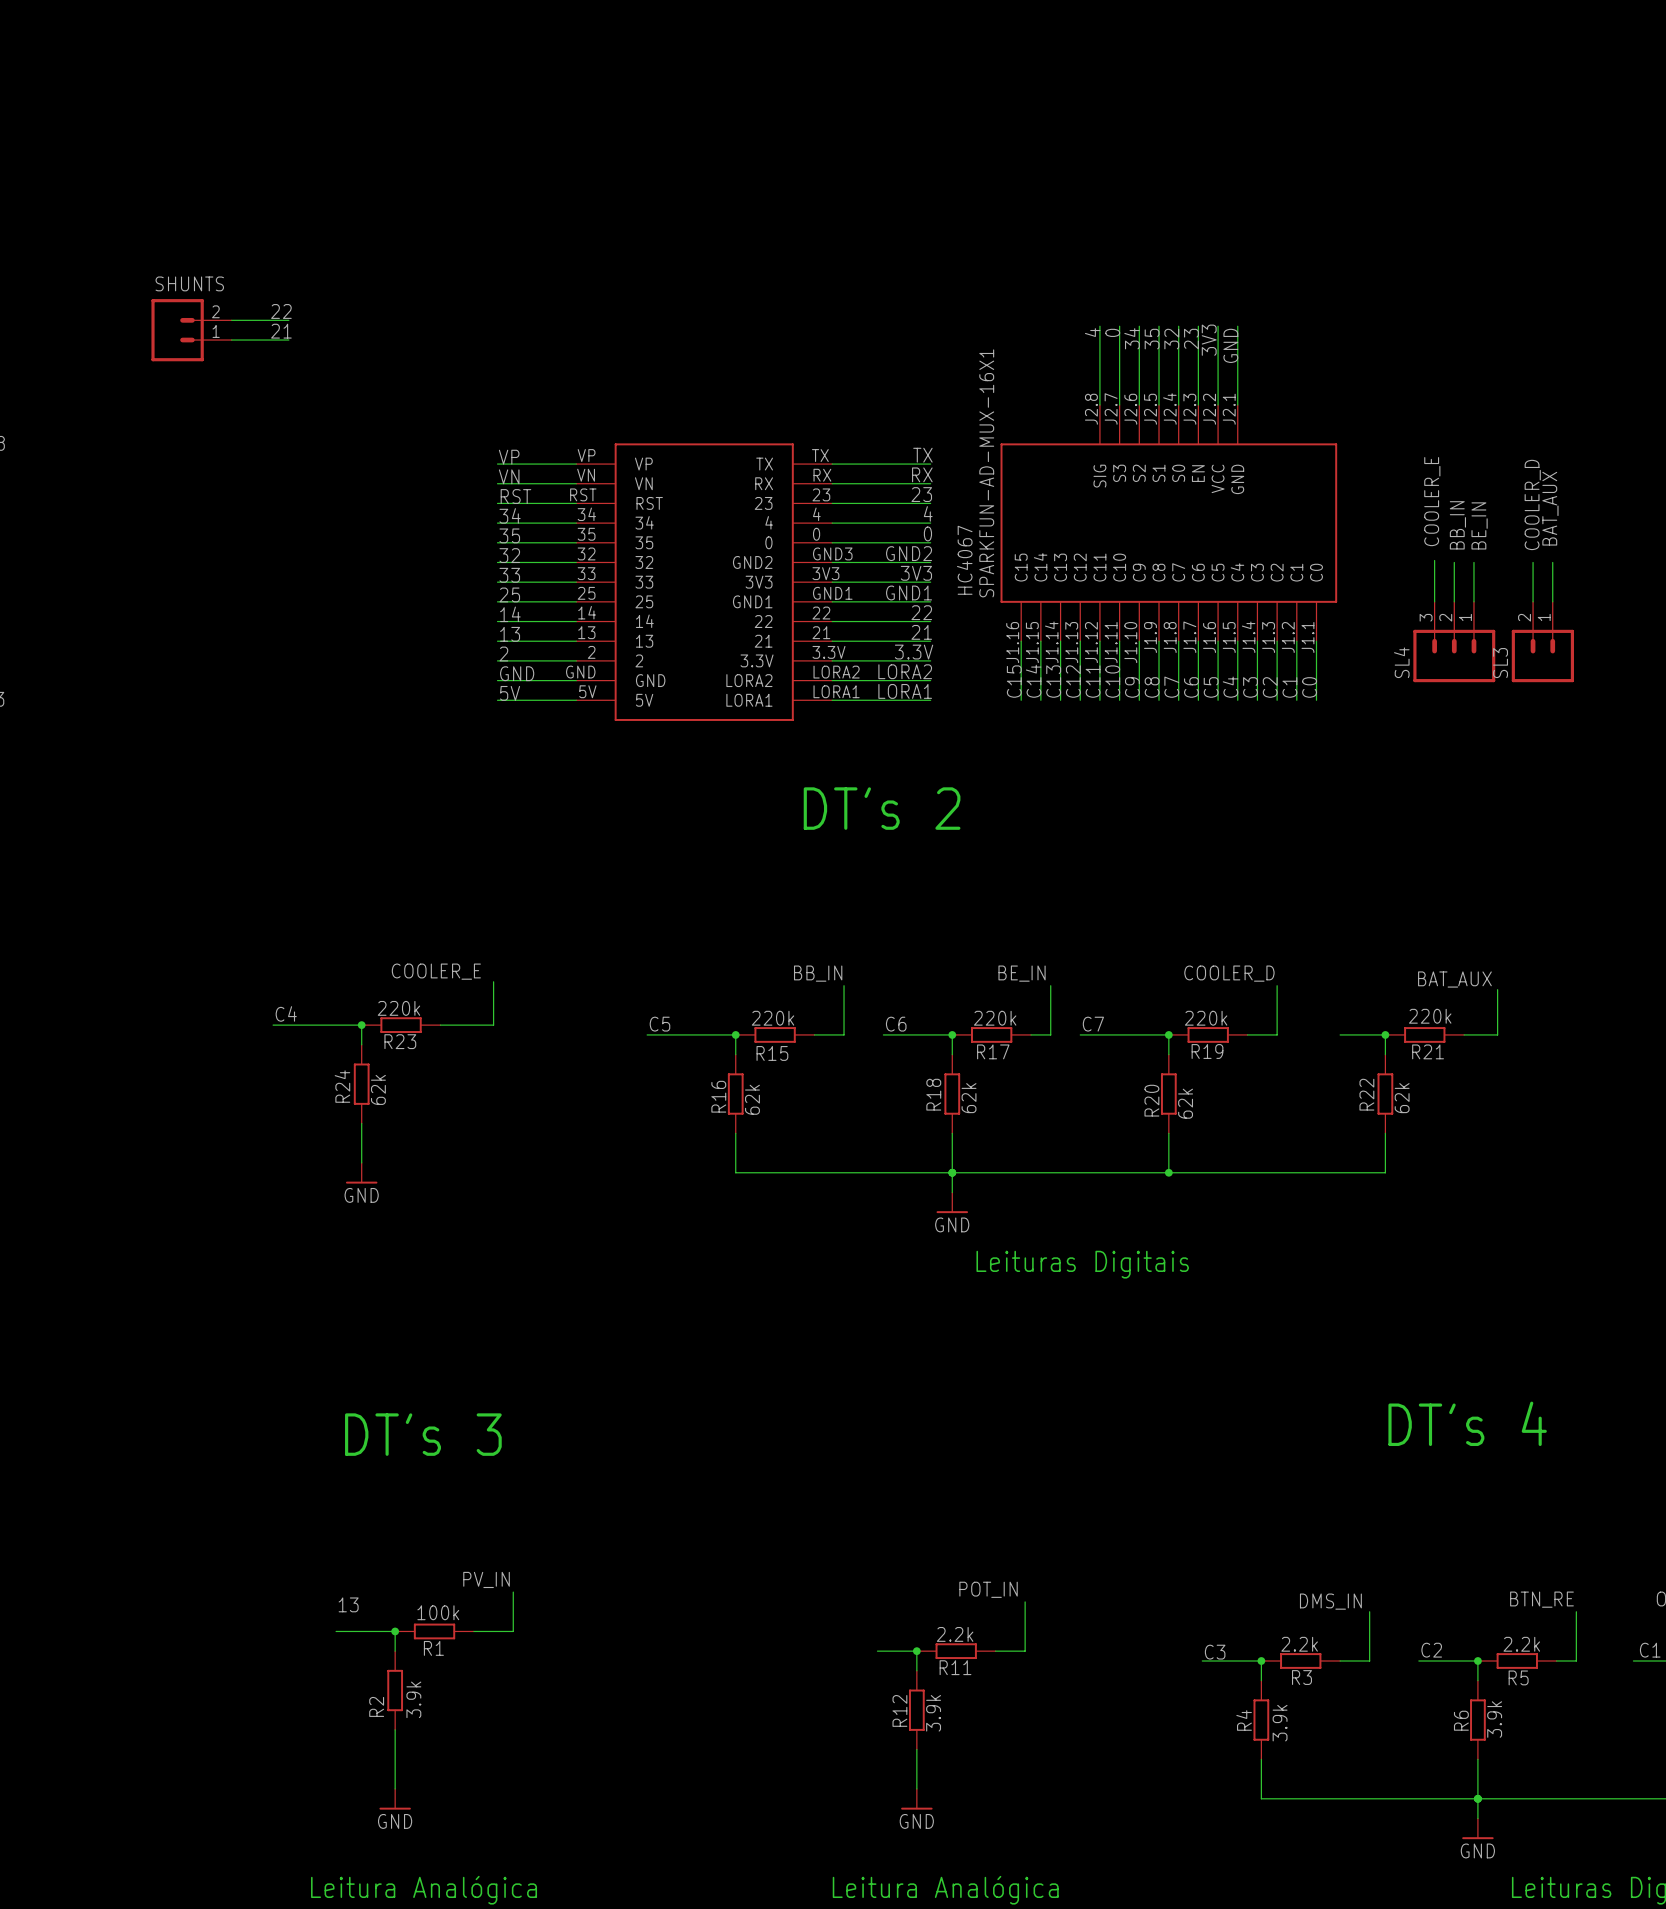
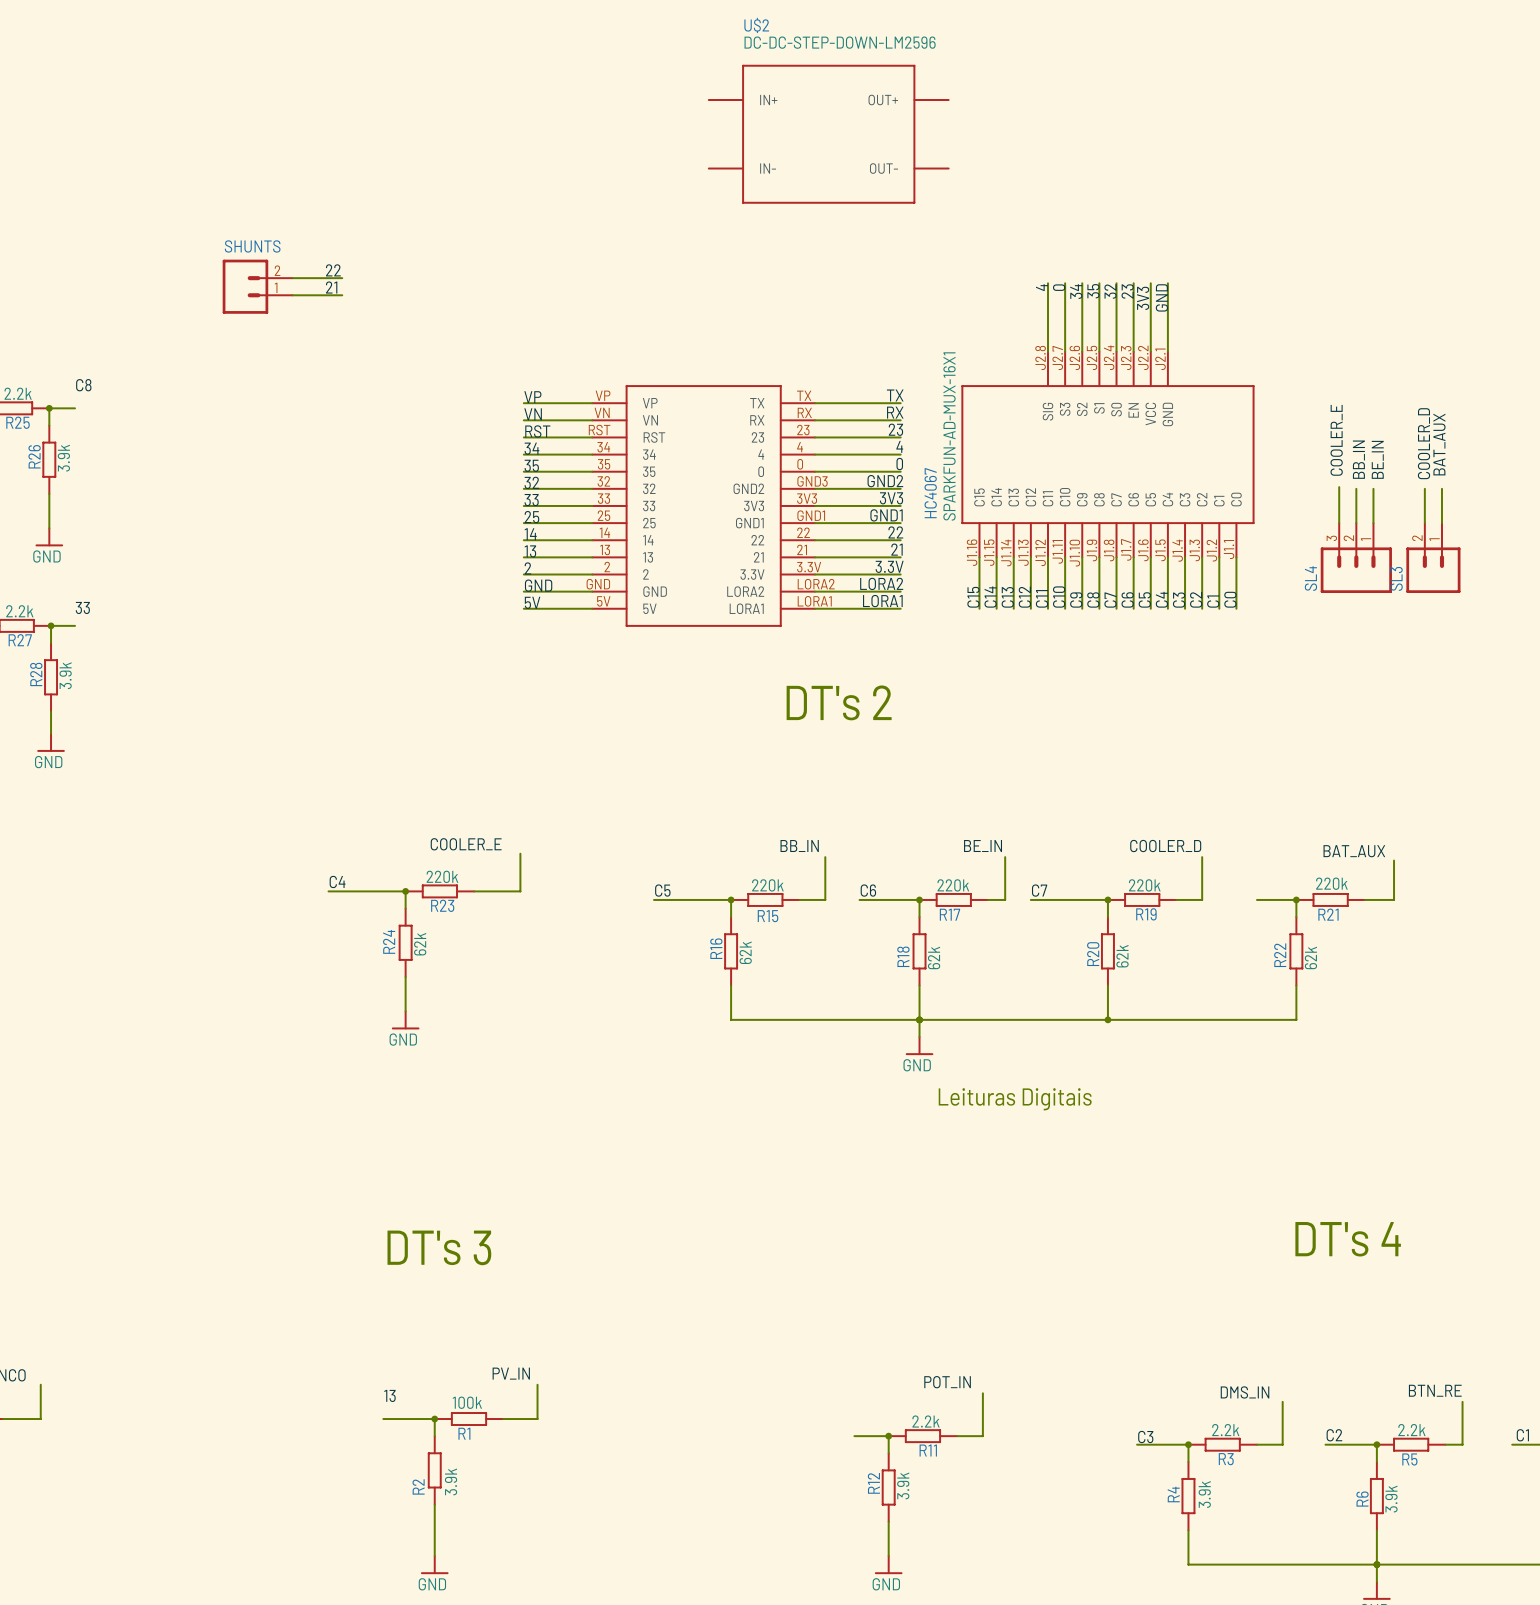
U$2: none -> DC-DC-STEP-DOWN-LM2596 (828, 134)

